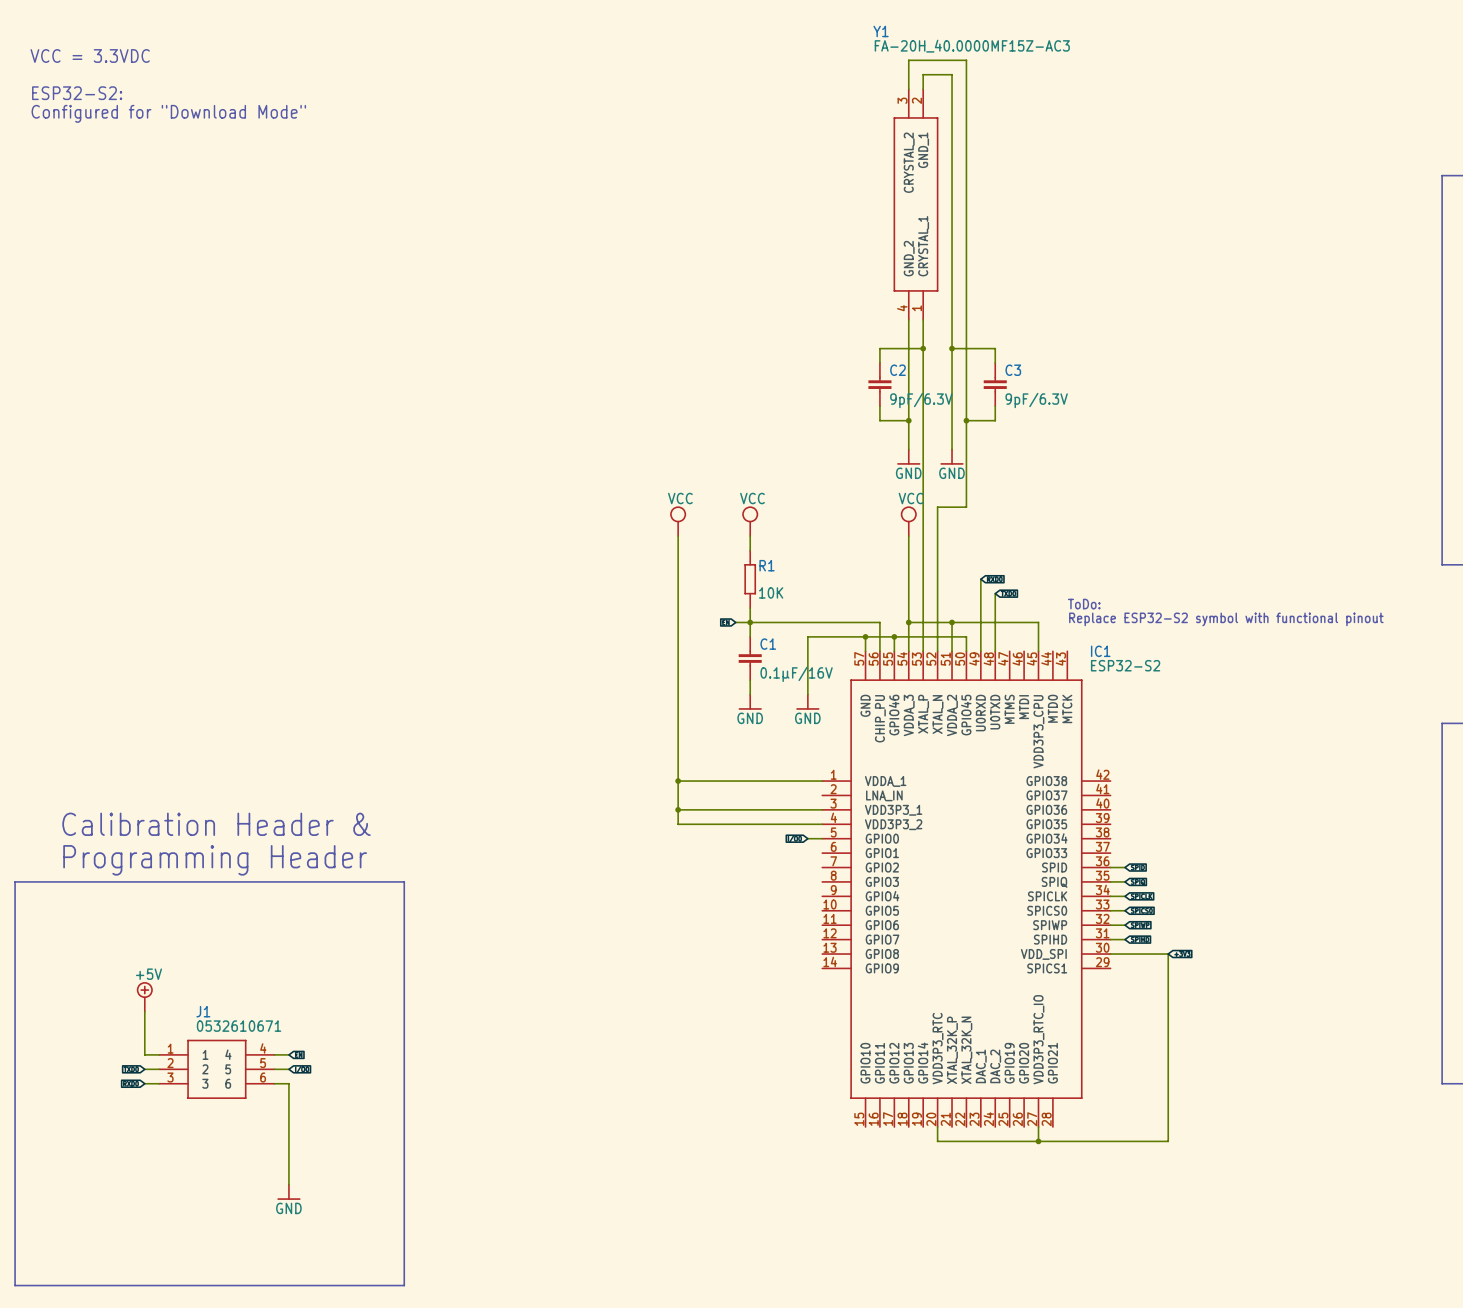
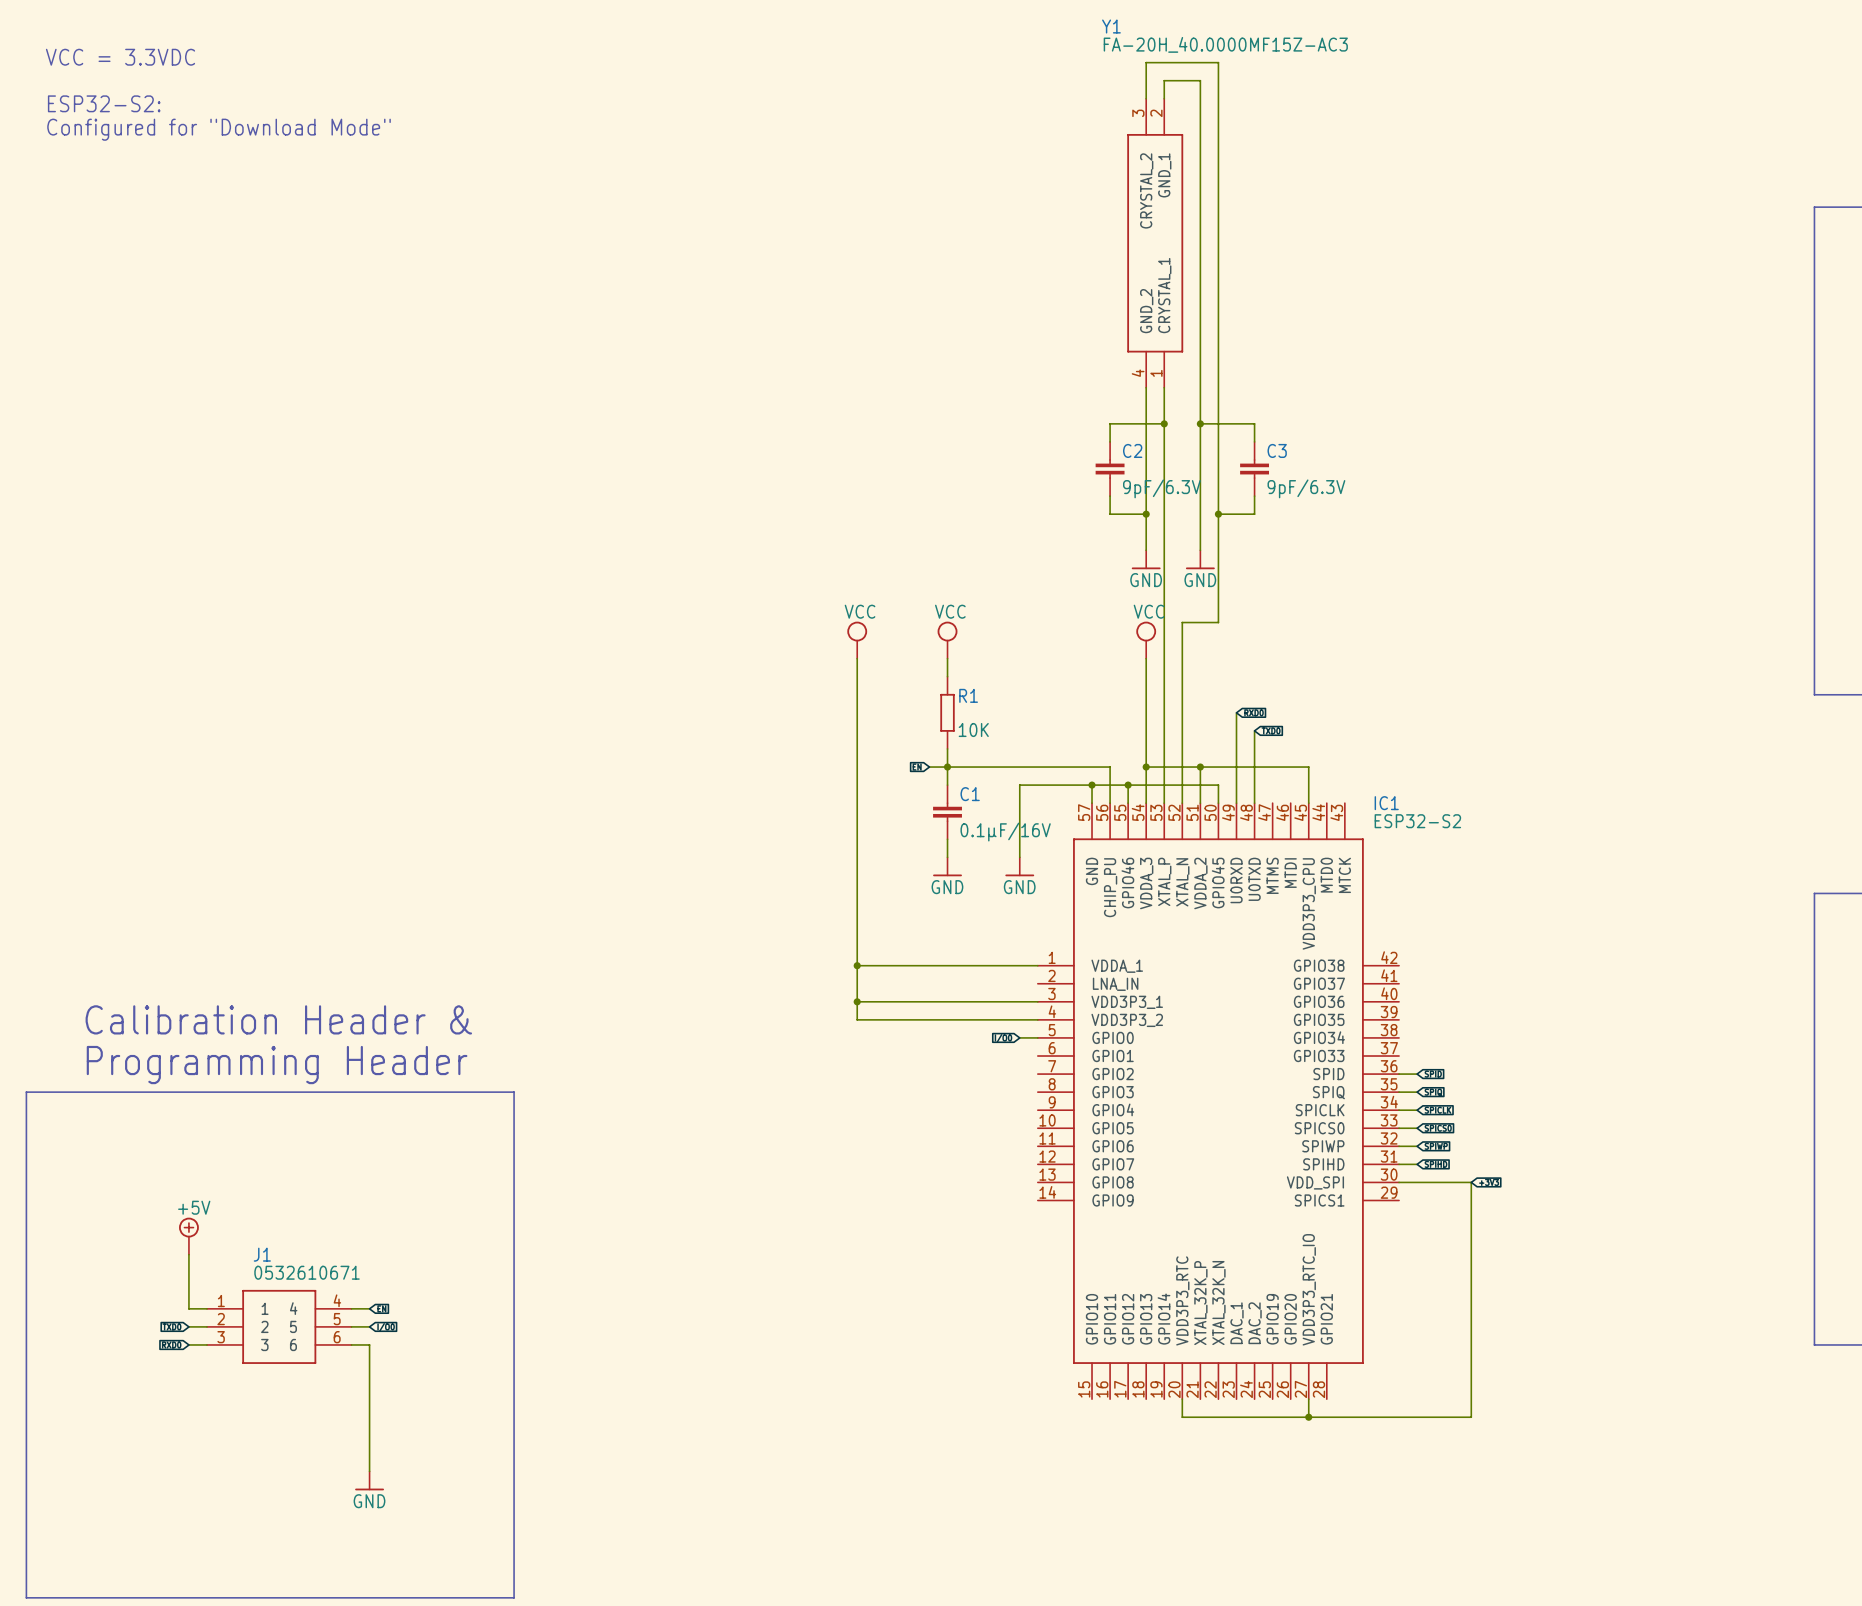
text: ToDo: (1084, 604) -> none
text: Replace ESP32-S2 symbol with functional pinout (1226, 619) -> none

